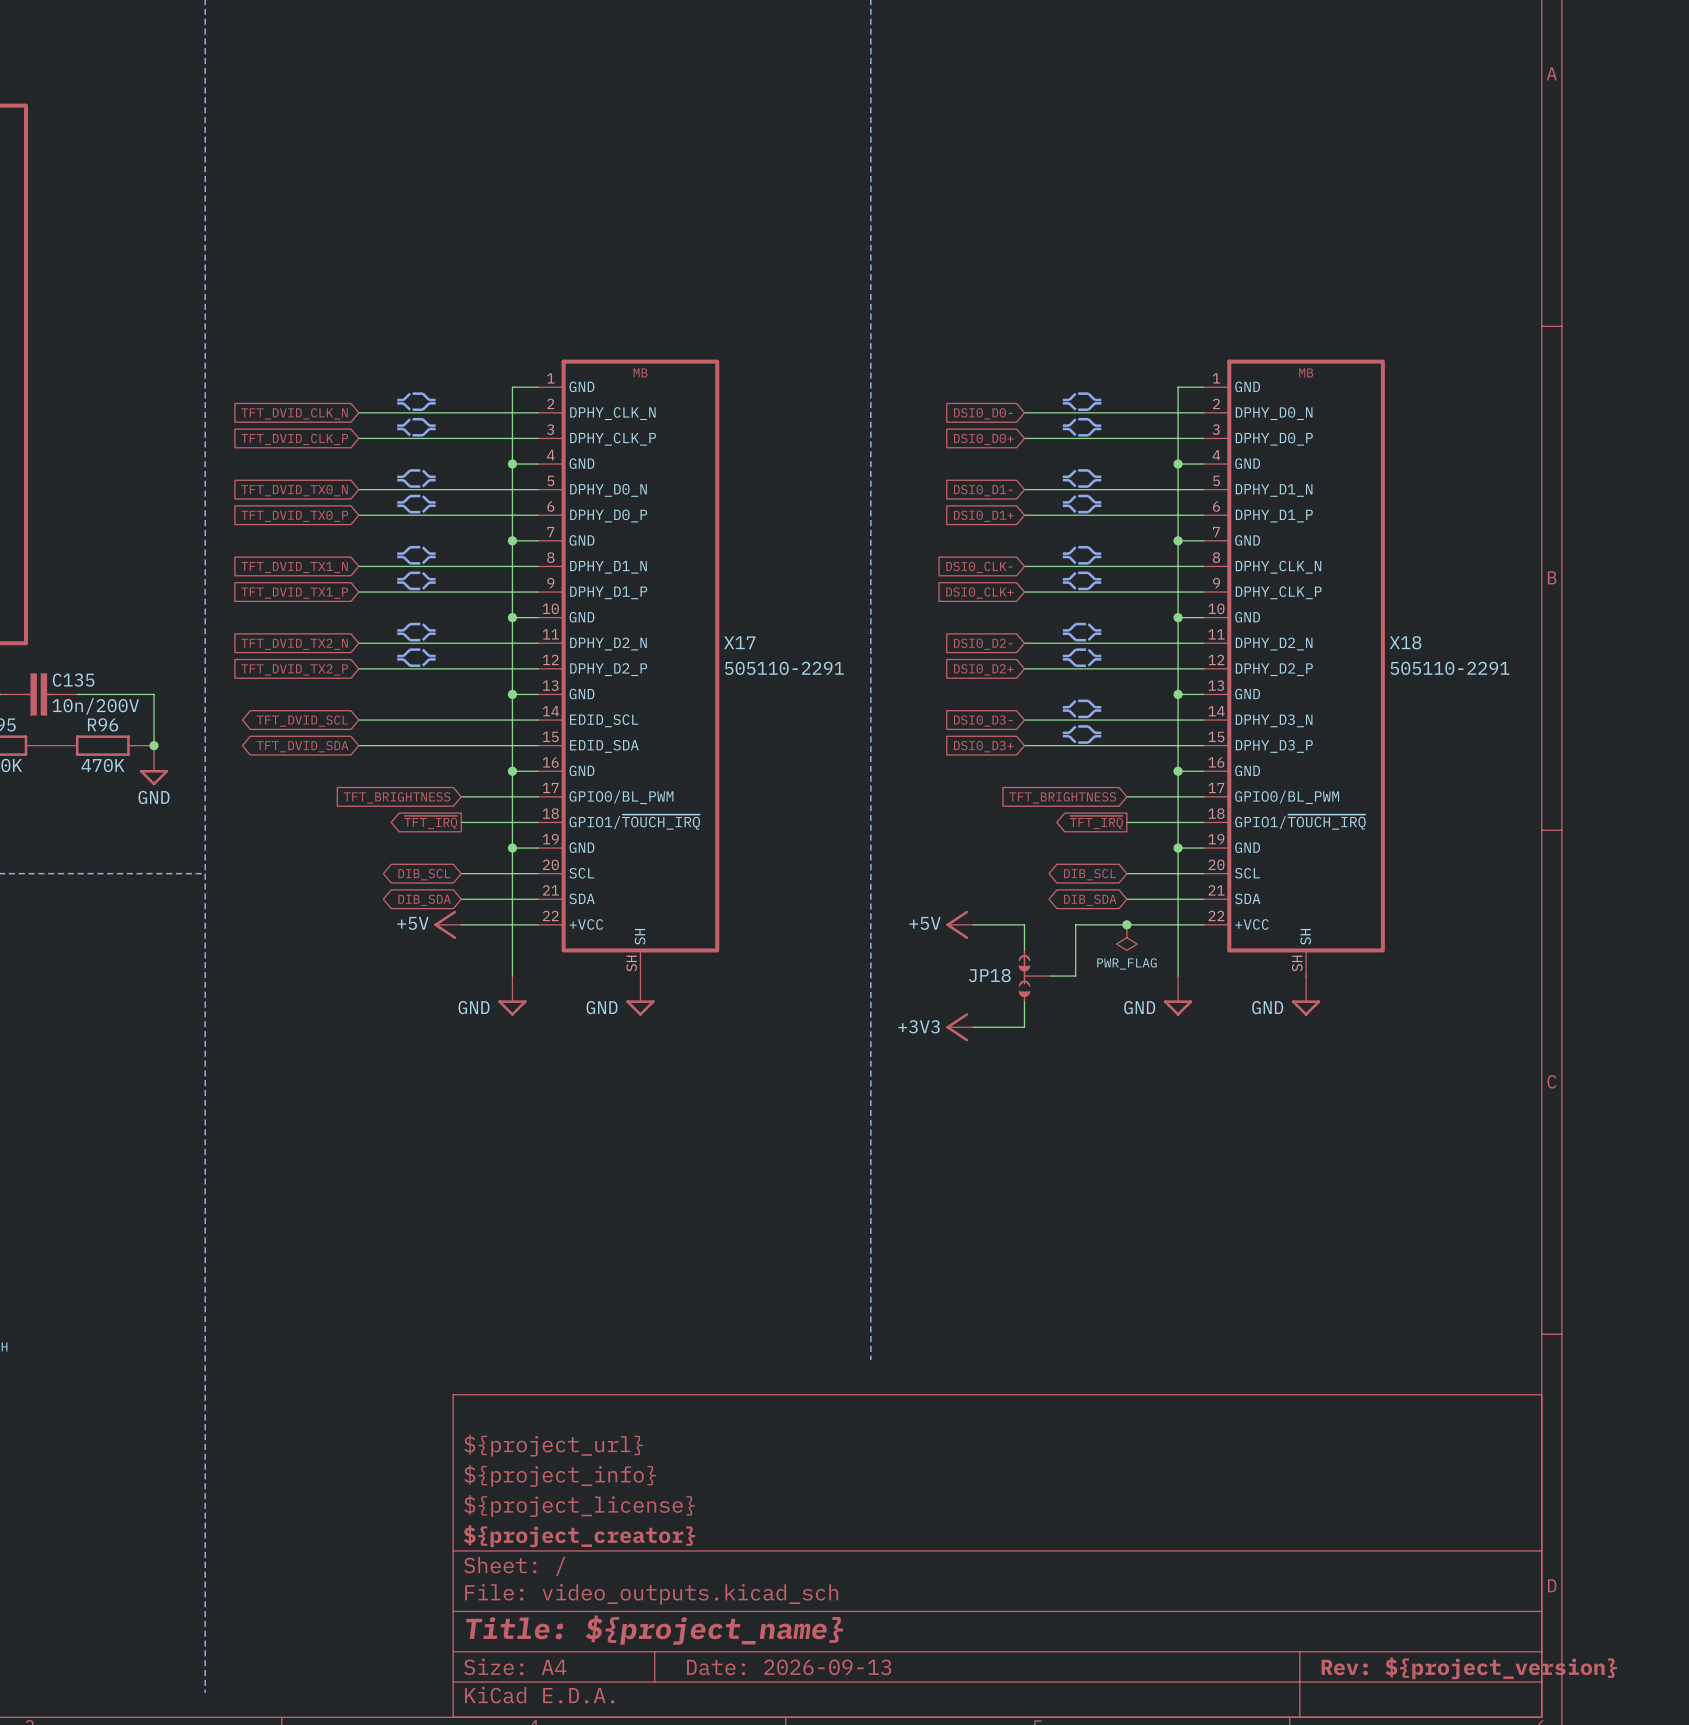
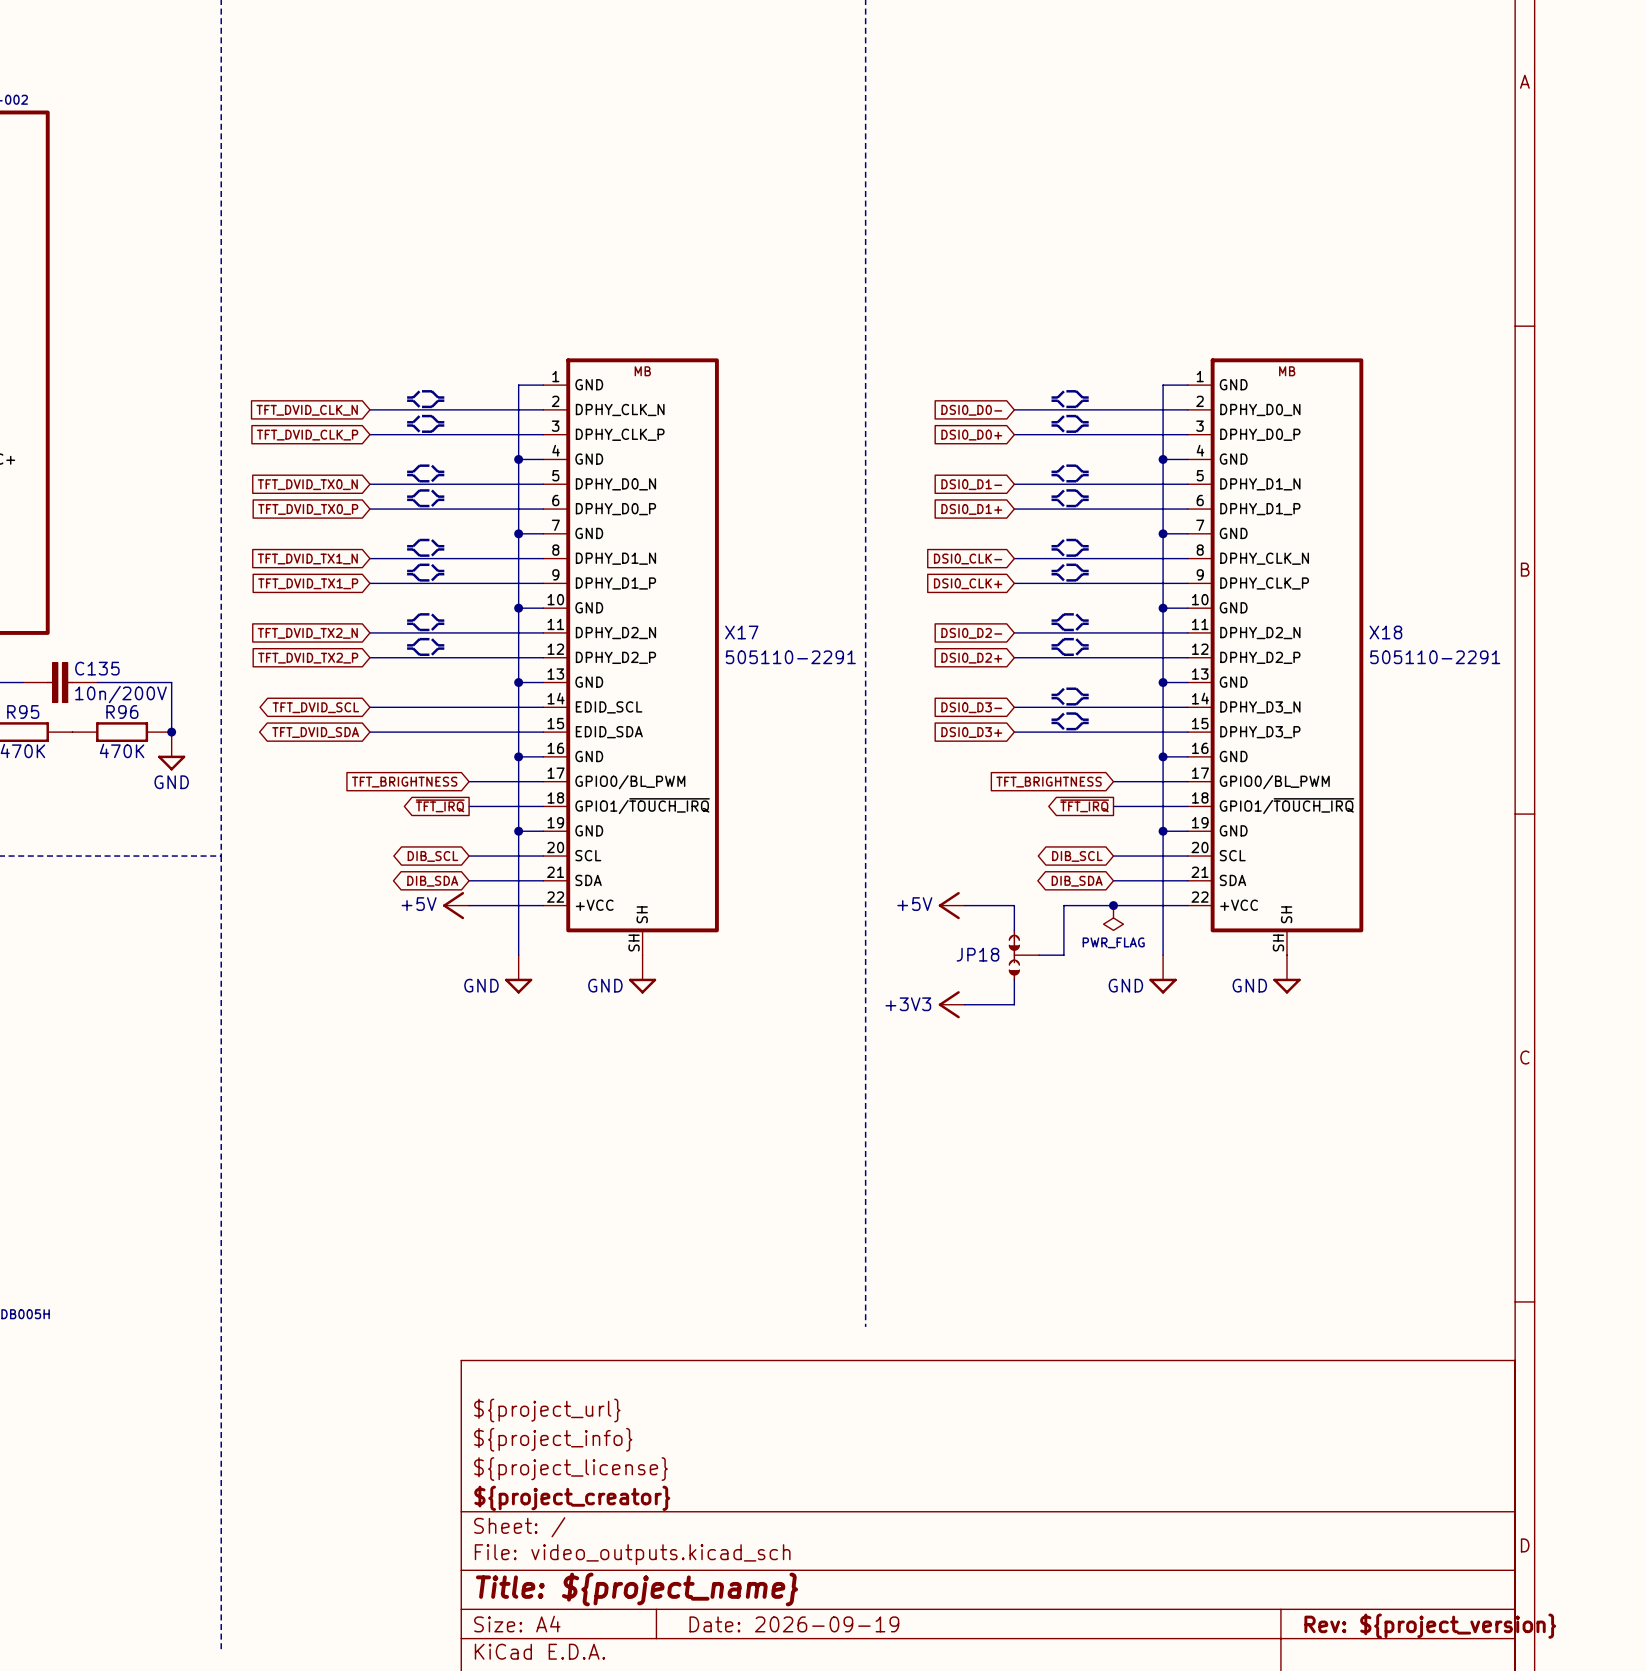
title block: Date: 2026-09-13 (789, 1667) -> Date: 2026-09-19 (794, 1624)

